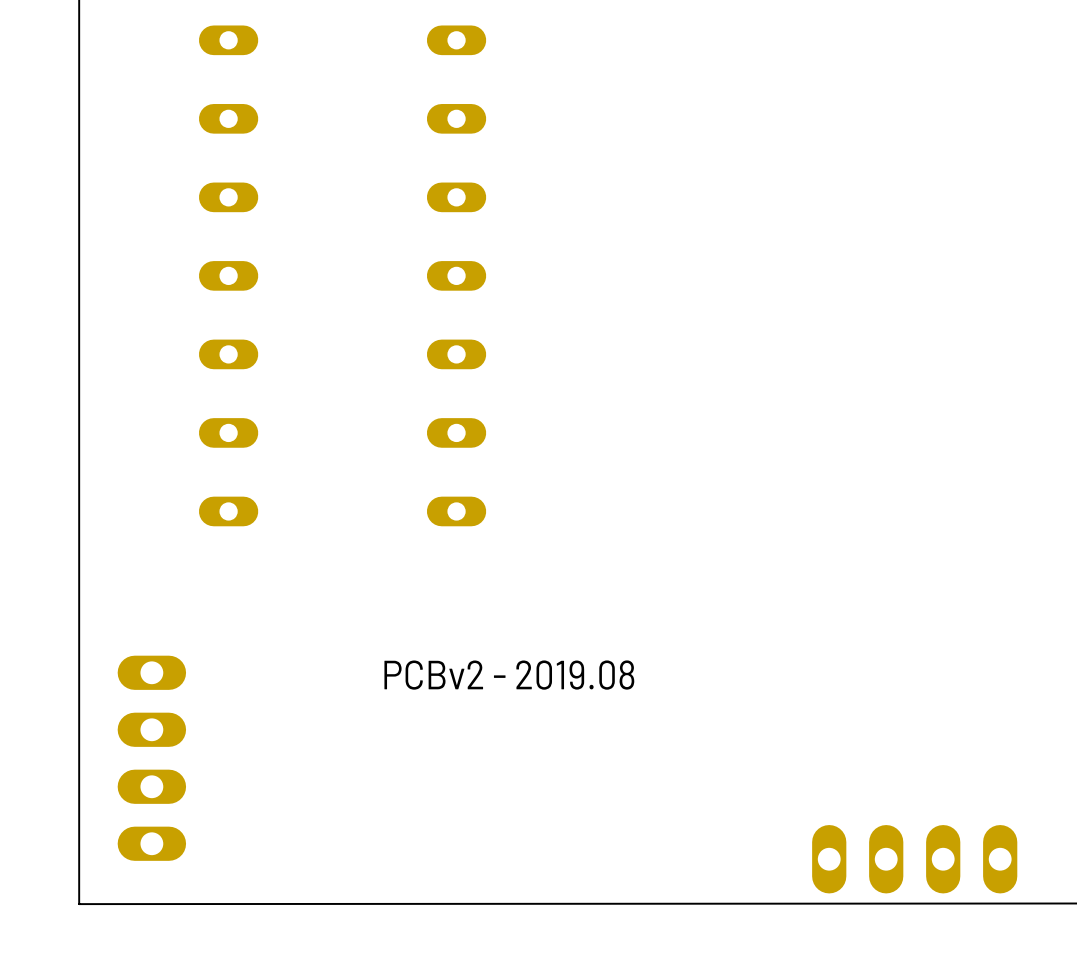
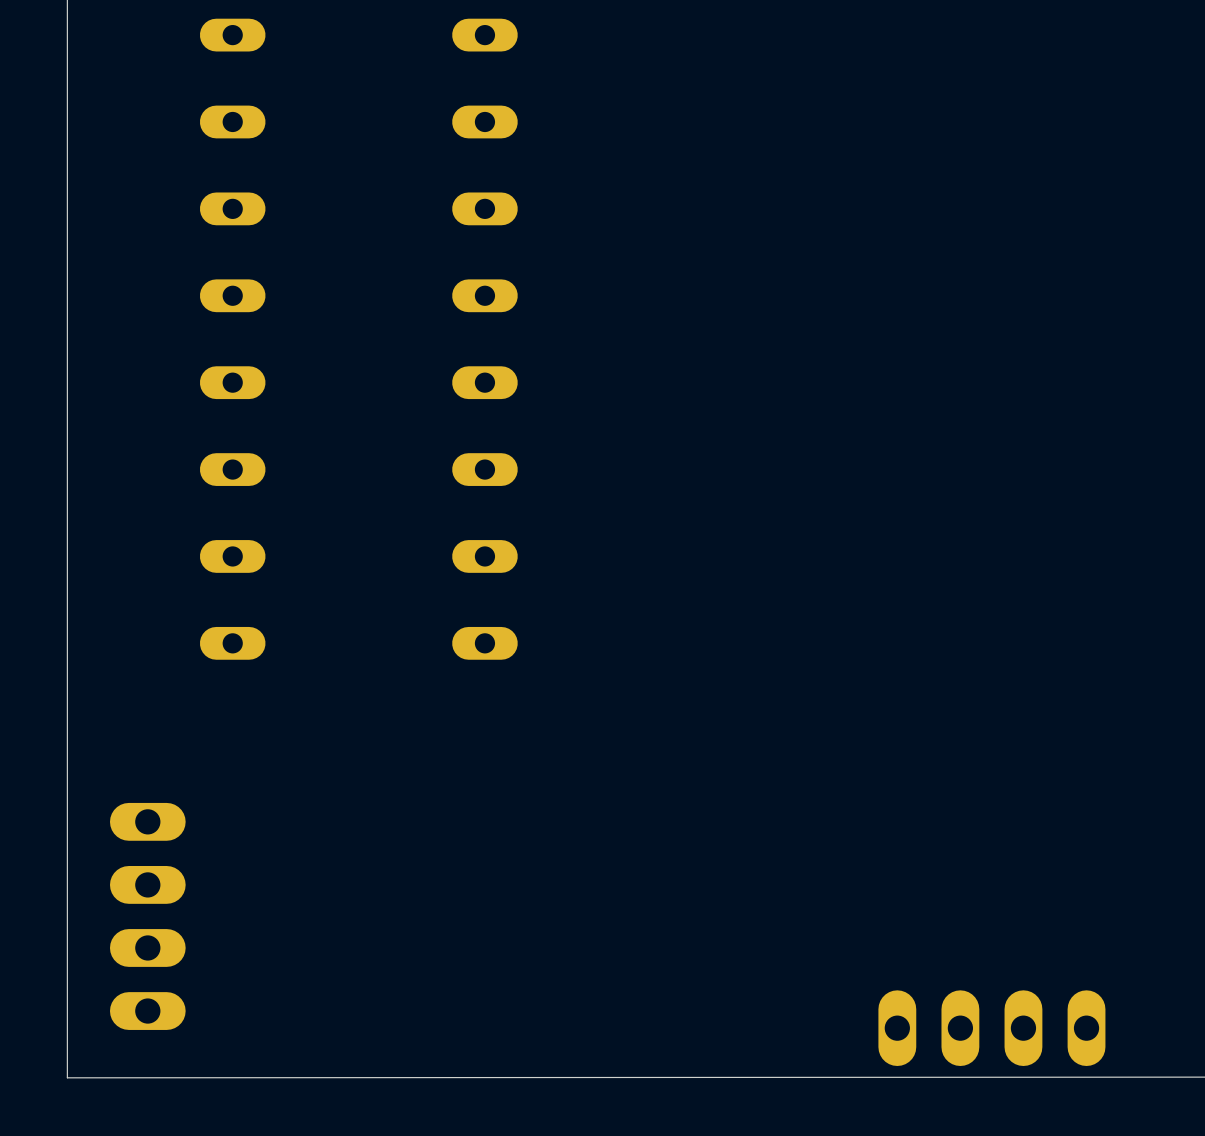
text: PCBv2 - 2019.08 (509, 675) -> none

